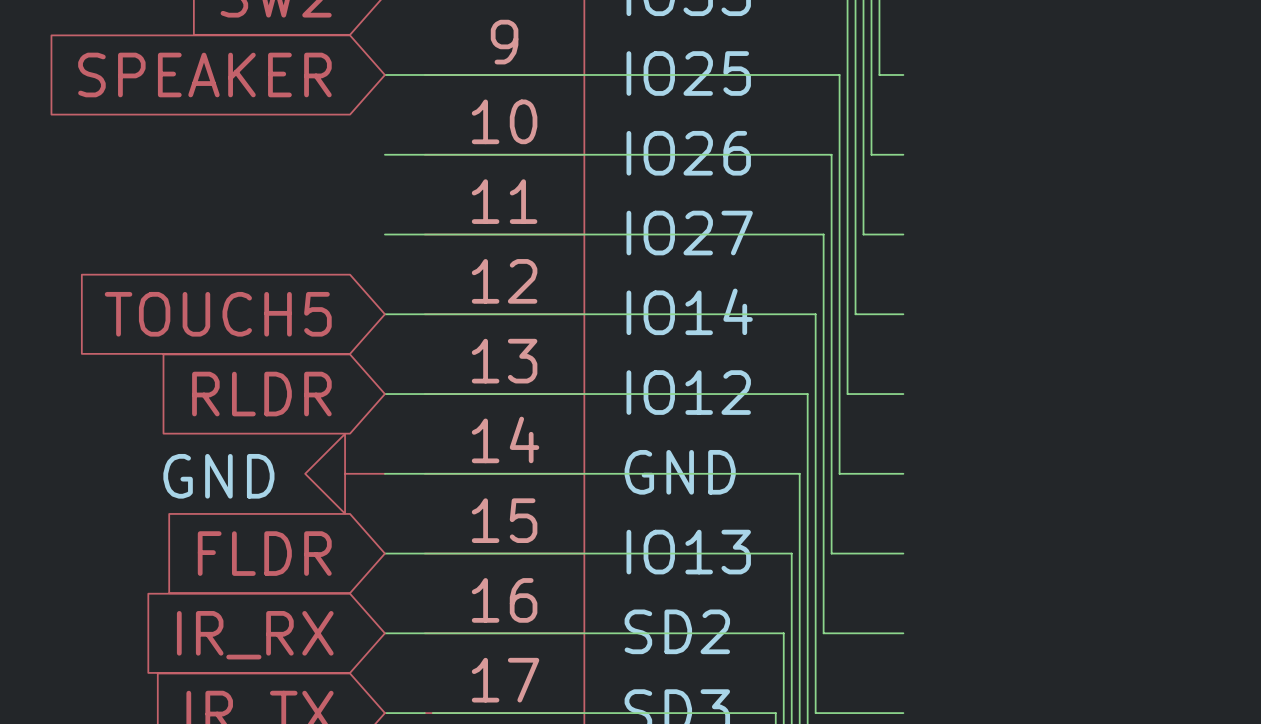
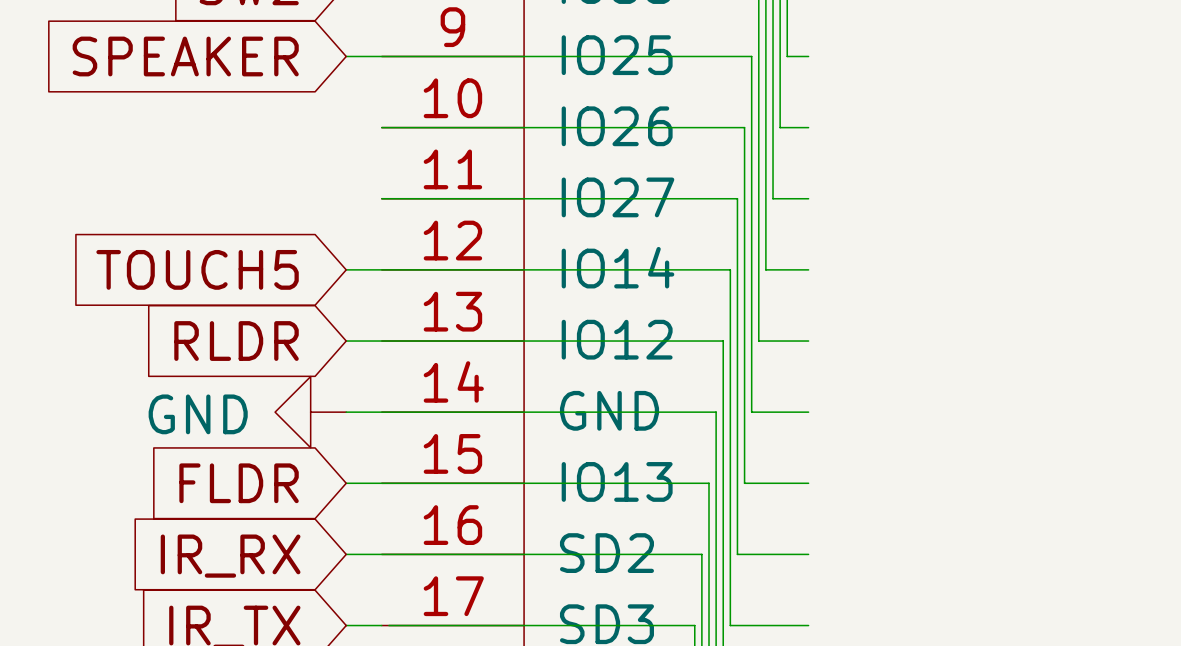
wire: (384, 154) (424, 154) -> none
wire: (384, 234) (424, 234) -> none

